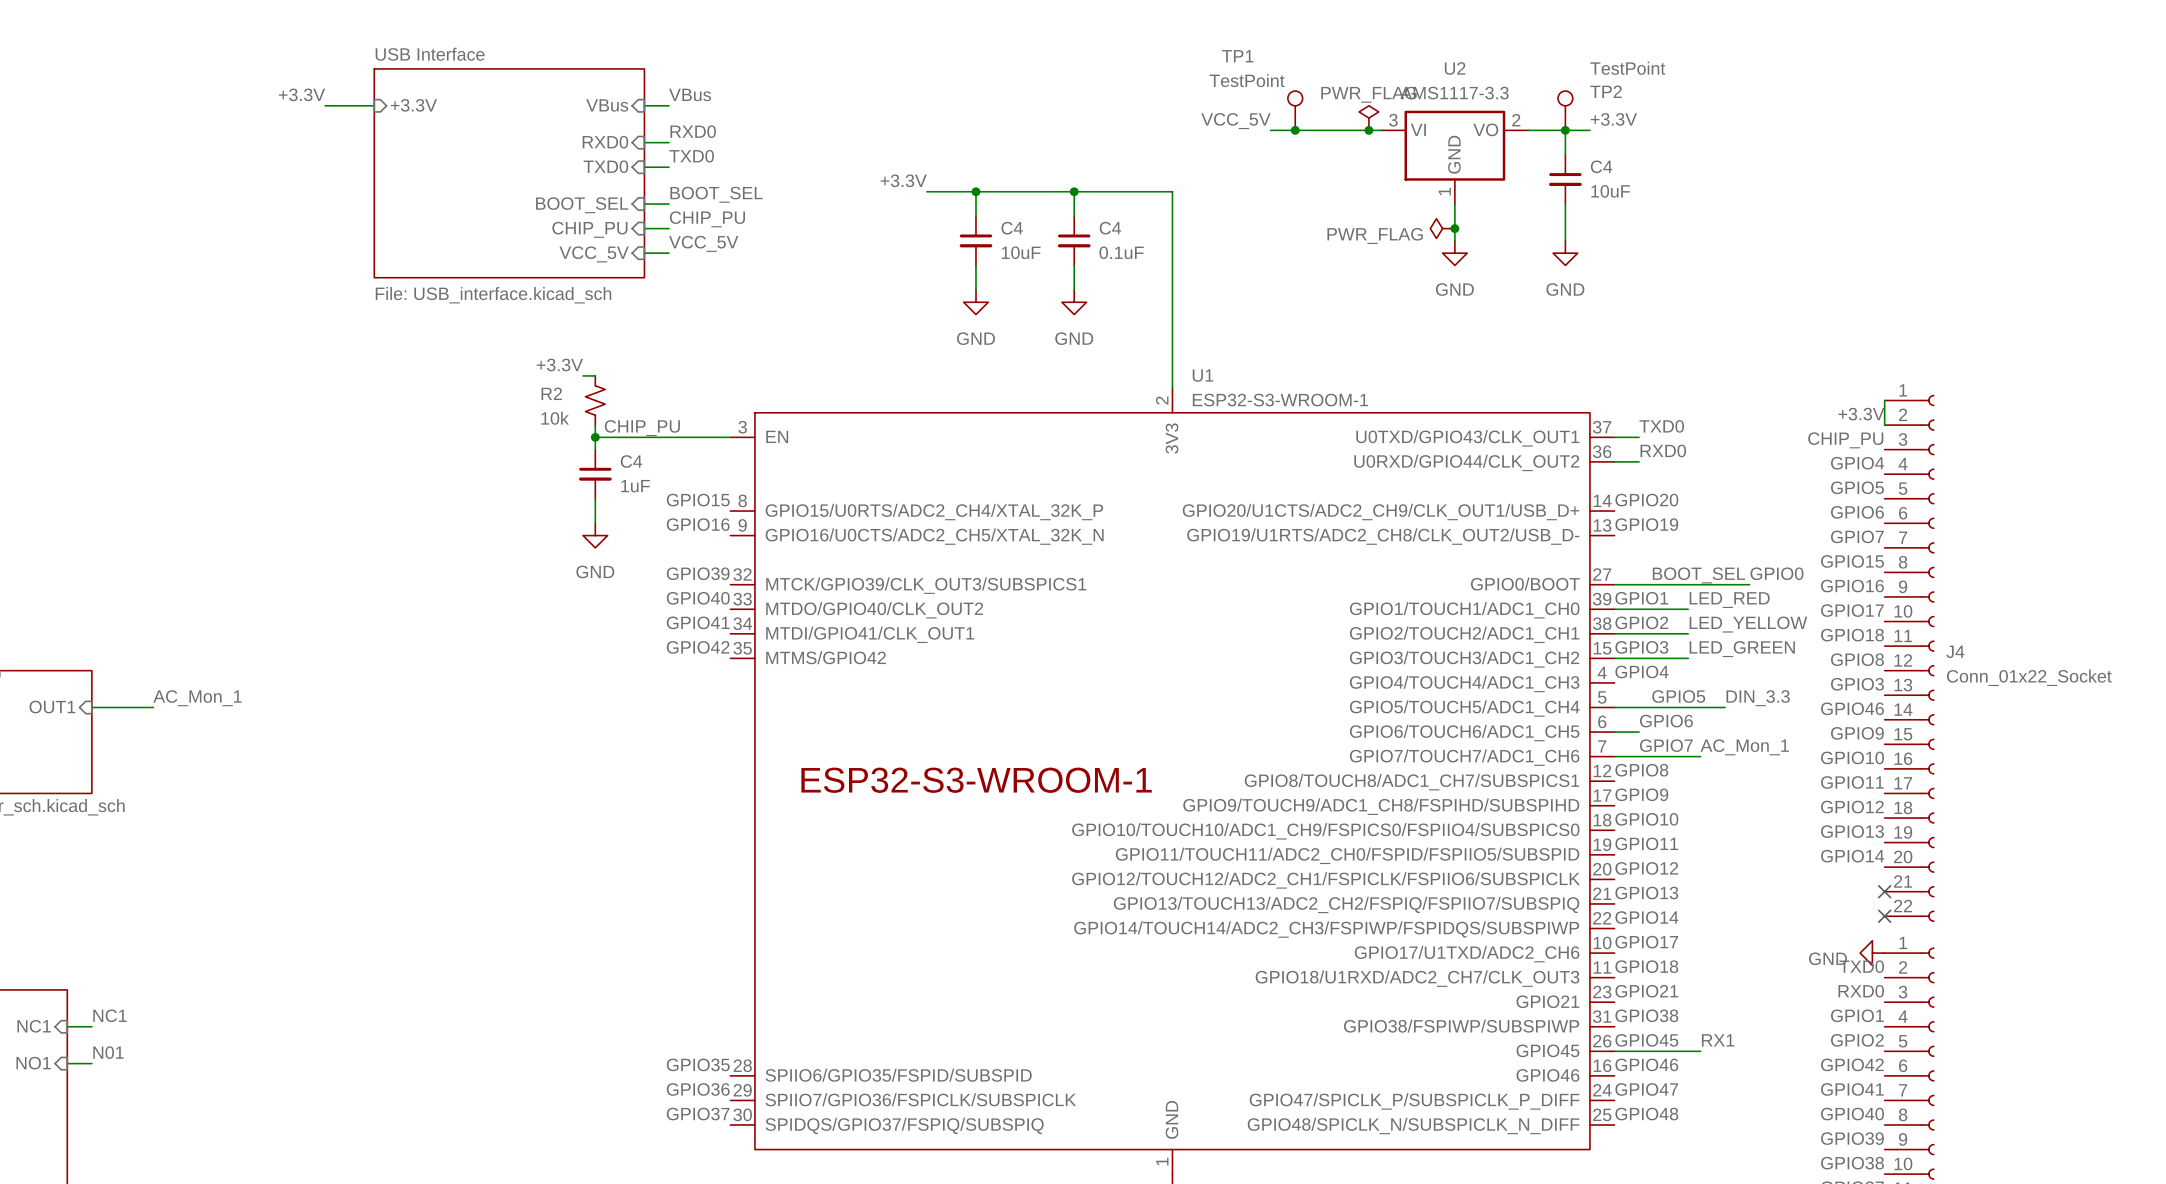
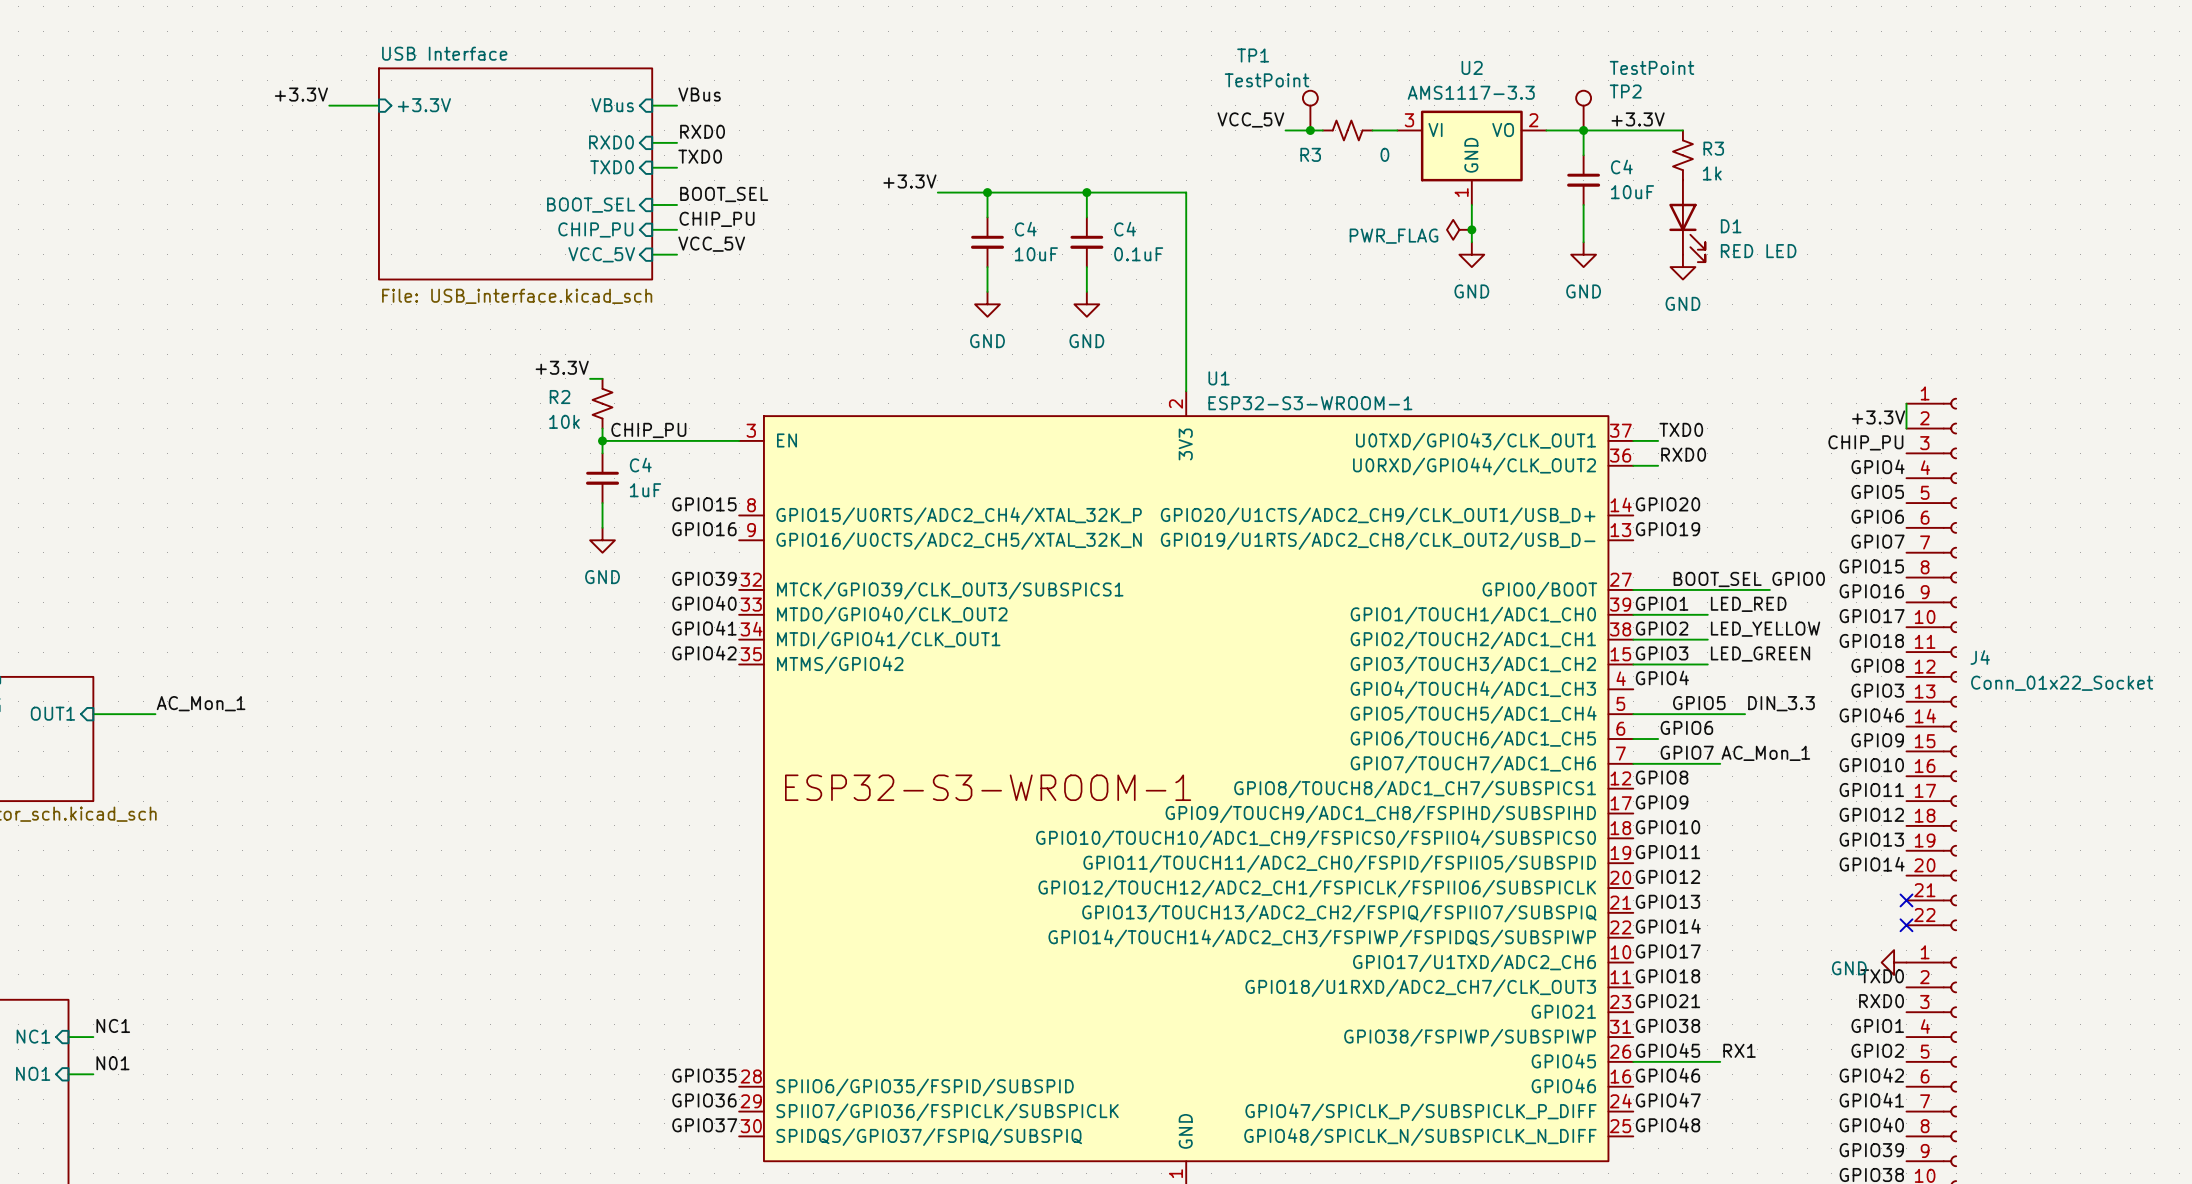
power symbol: PWR_FLAG (1368, 118) -> none
R3: none -> 0 (1347, 130)
junction: (1368, 130) -> none
wire: none -> (1608, 130) (1682, 130)
R3: none -> 1k (1682, 155)
D1: none -> RED LED (1687, 221)
power symbol: none -> GND (1682, 267)

